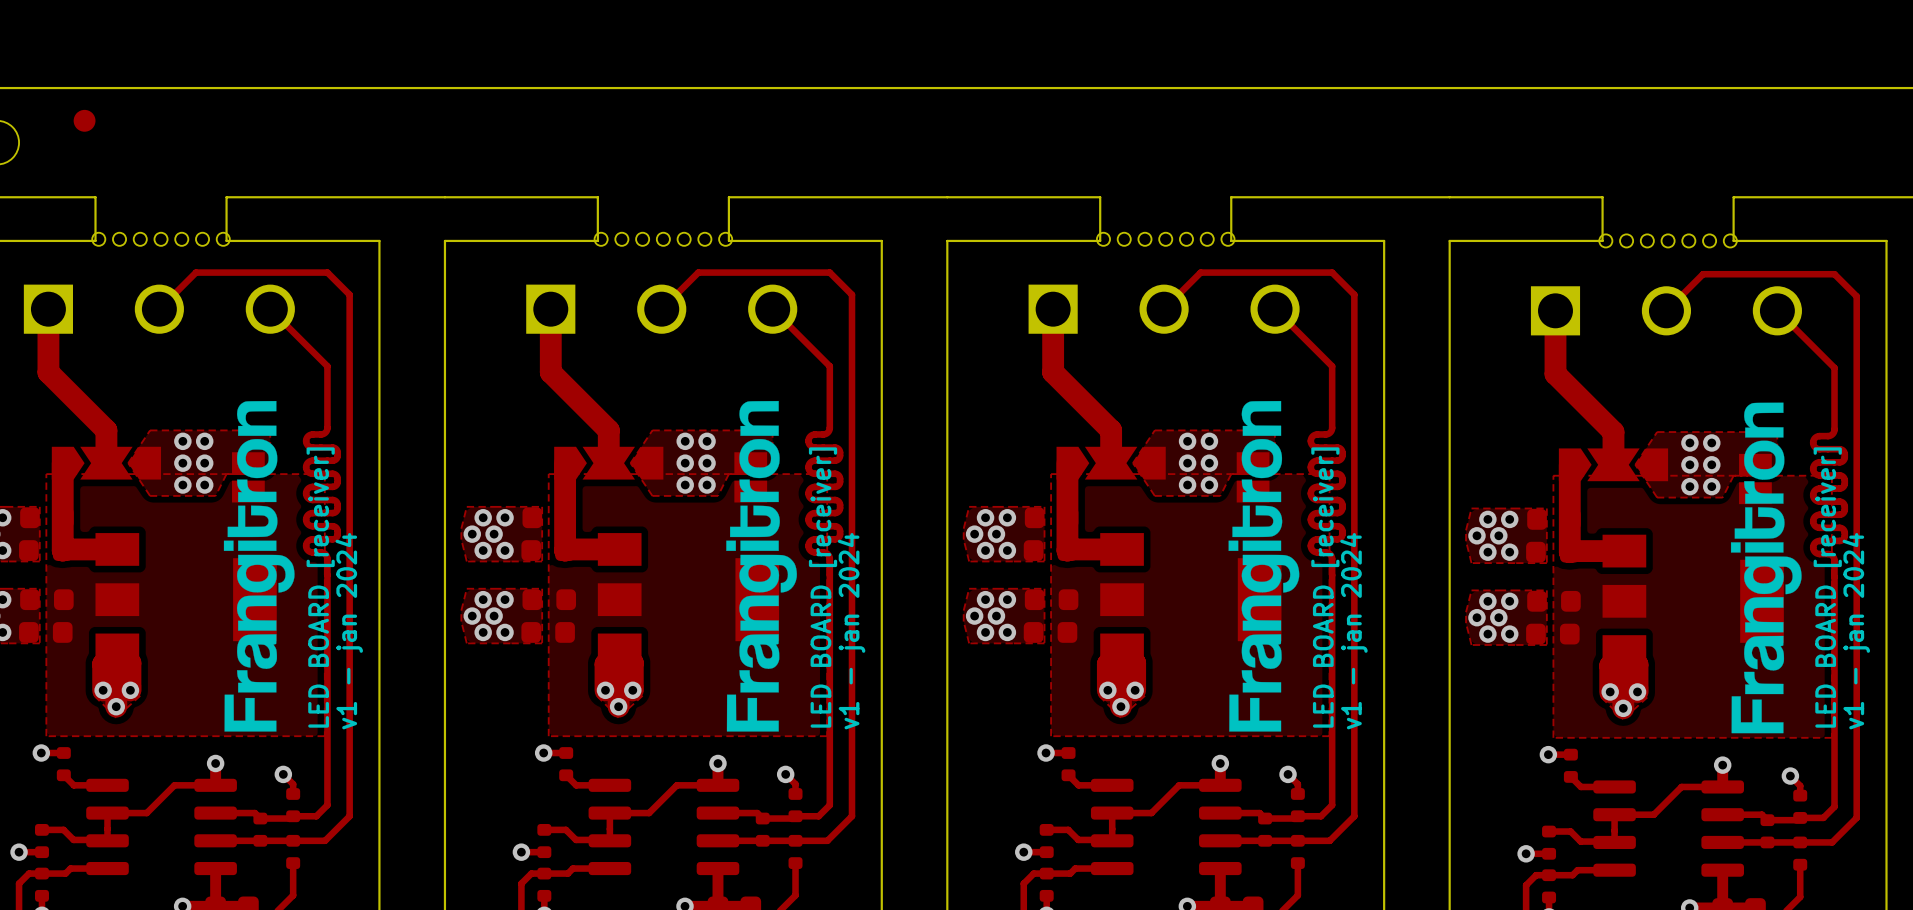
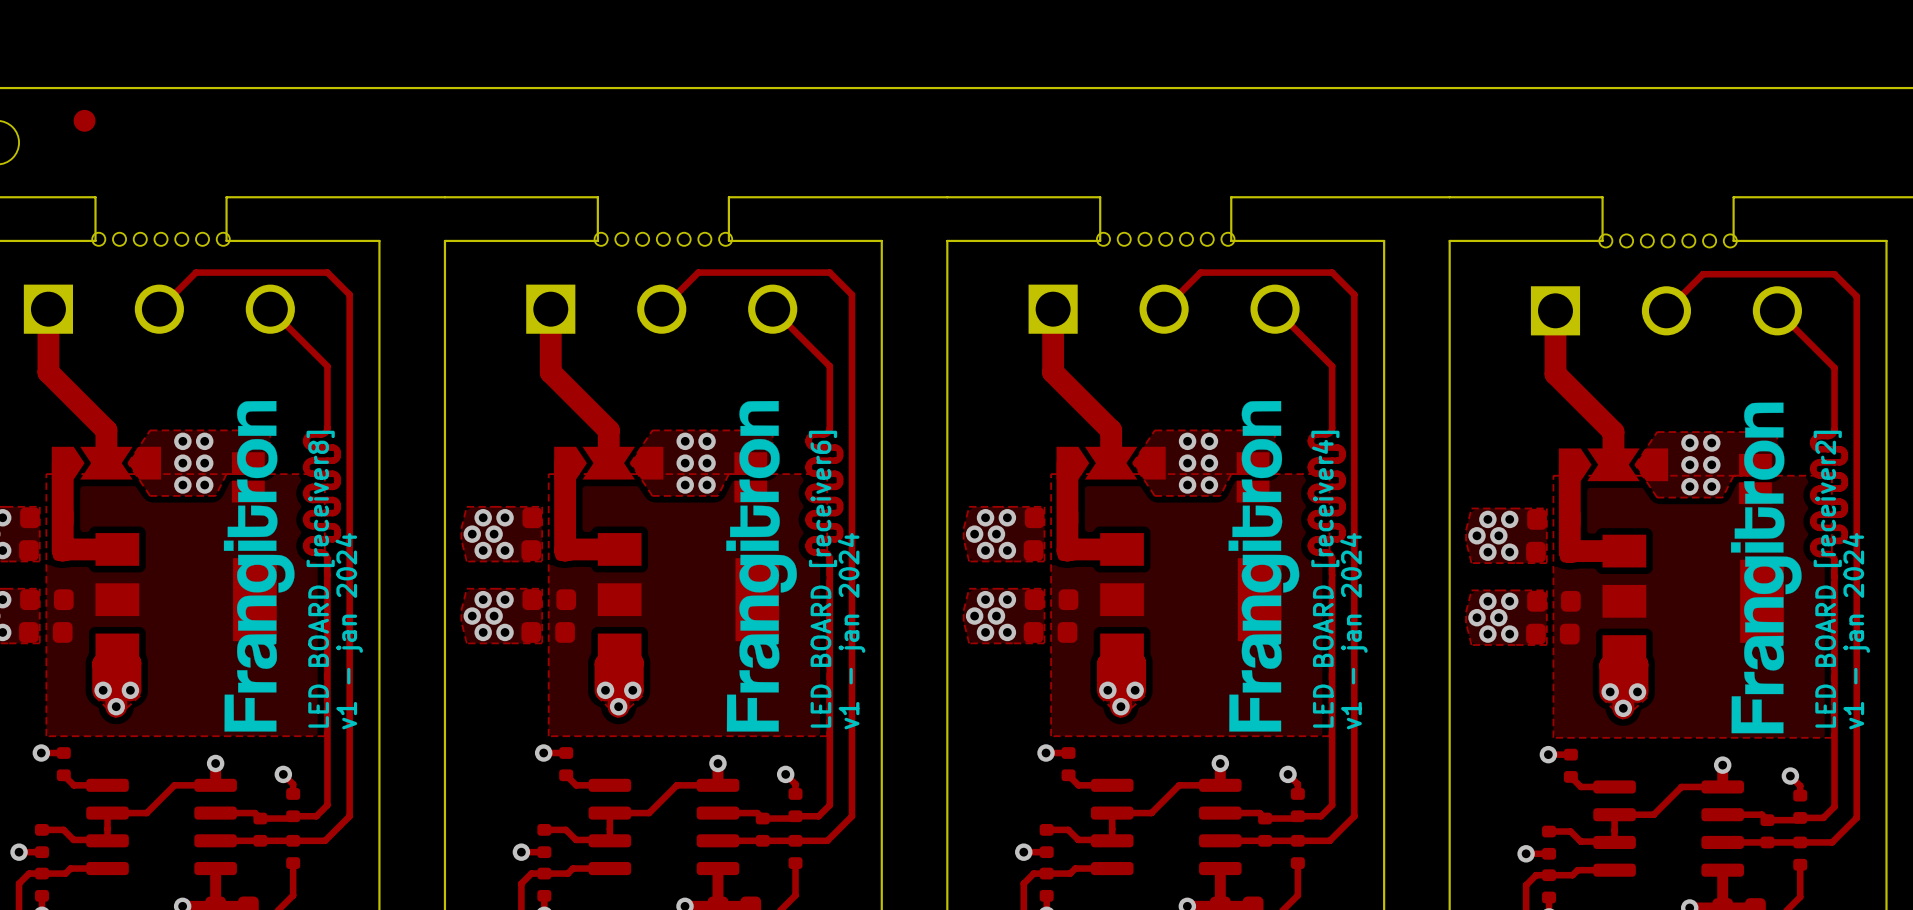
text: LED BOARD [receiver] (320, 587) -> LED BOARD [receiver8] (320, 579)
text: LED BOARD [receiver] (823, 587) -> LED BOARD [receiver6] (823, 579)
text: LED BOARD [receiver] (1325, 587) -> LED BOARD [receiver4] (1325, 579)
text: LED BOARD [receiver] (1827, 587) -> LED BOARD [receiver2] (1827, 579)

